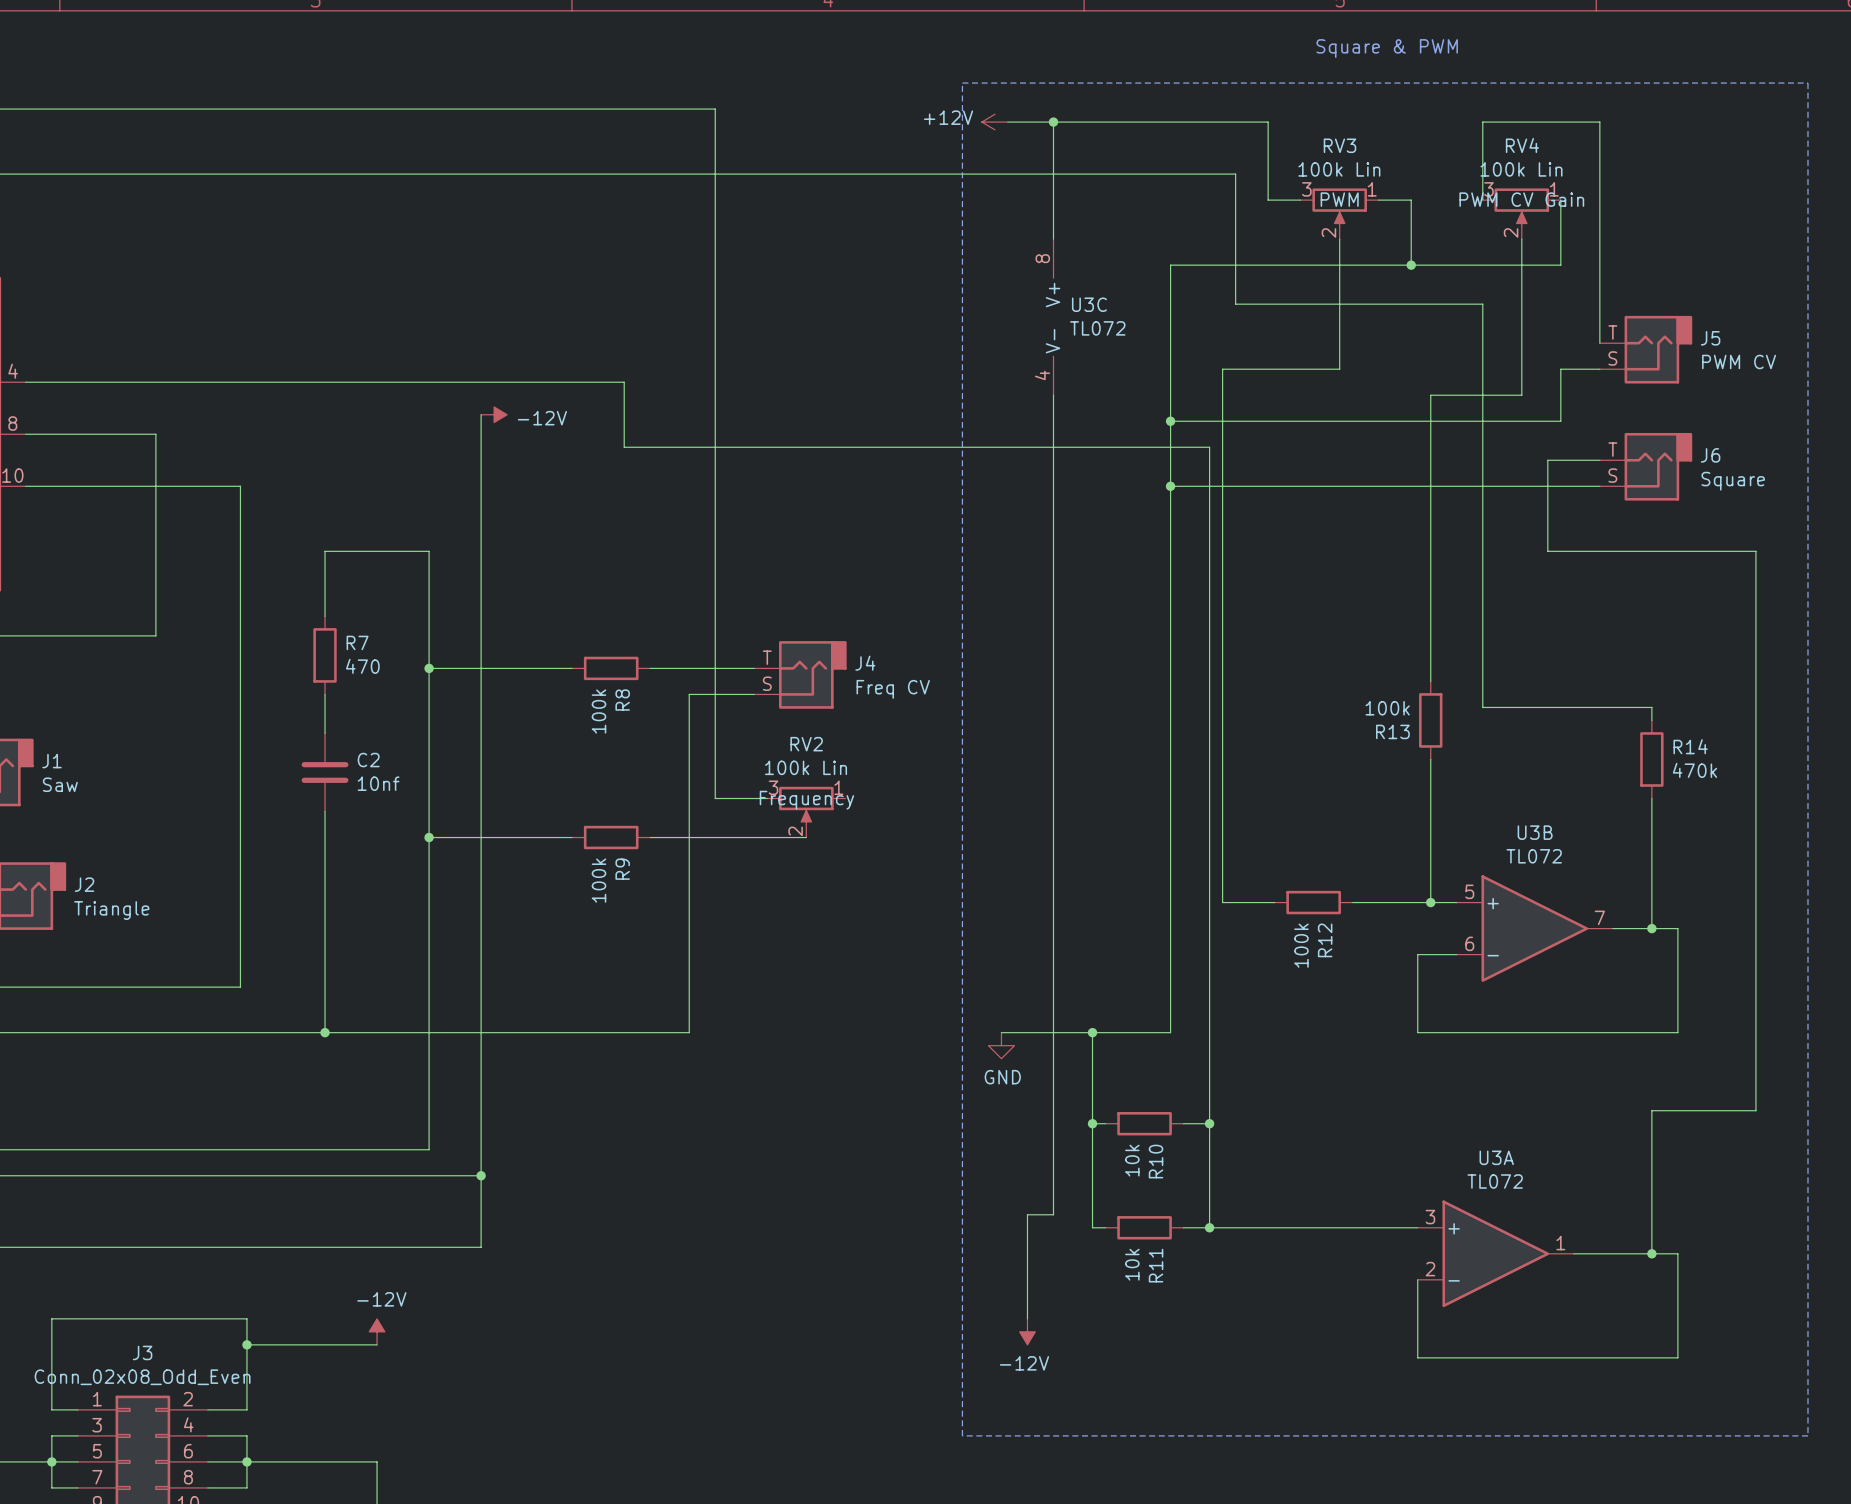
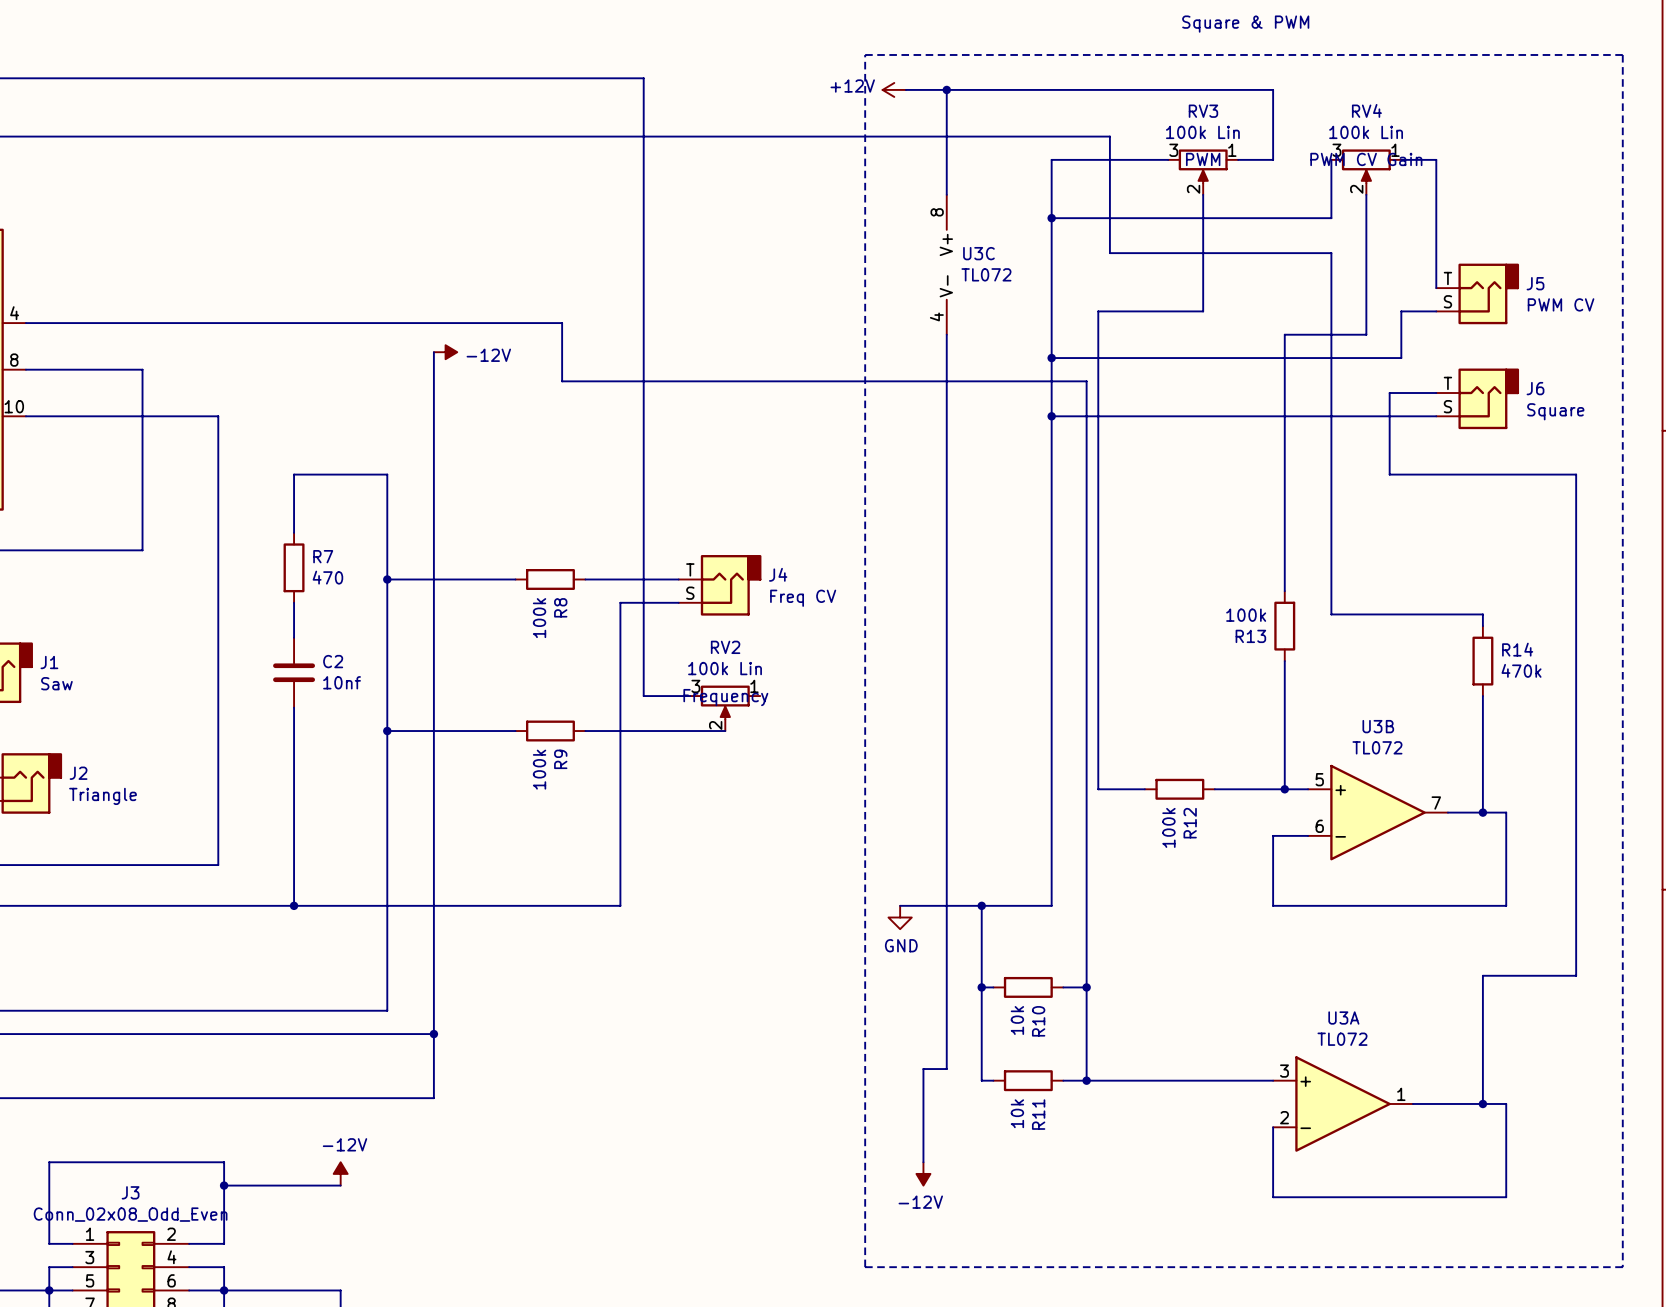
wire: (1268, 122) (1268, 200) -> (1139, 89) (1273, 89) (1273, 159) (1267, 159)
wire: none -> (1139, 159) (1051, 159) (1051, 218)
wire: (1411, 200) (1411, 265) -> none
wire: (1482, 200) (1482, 122) (1599, 122) (1599, 200) -> (1401, 159) (1436, 159)
wire: (1560, 200) (1560, 265) (1482, 265) -> (1331, 159) (1331, 218)
junction: none -> (1051, 218)
junction: (1411, 265) -> none

